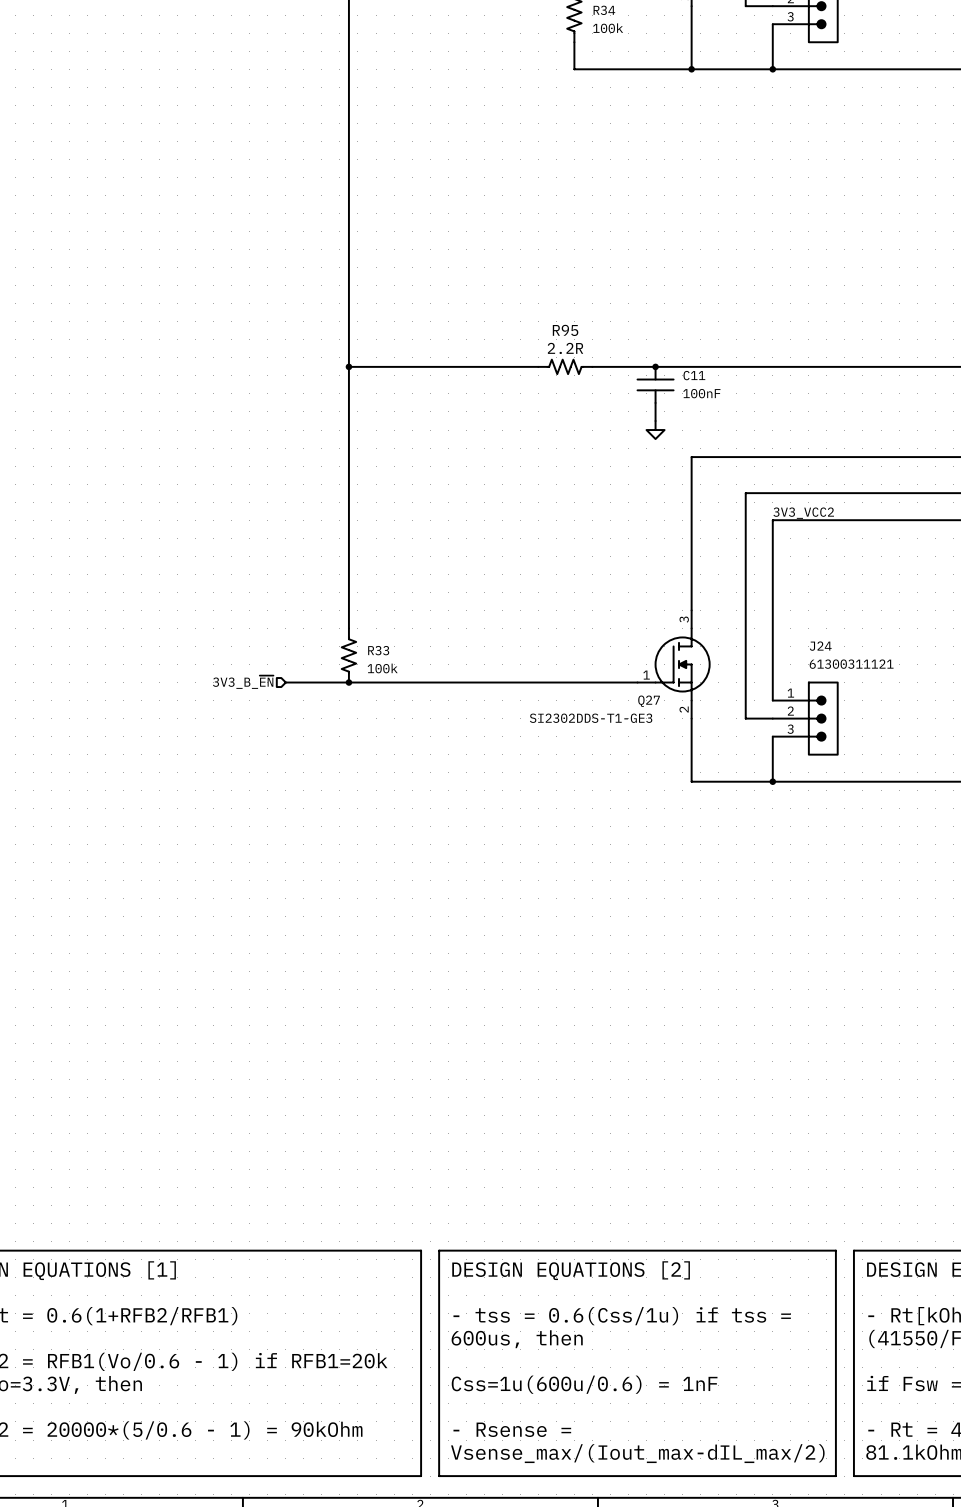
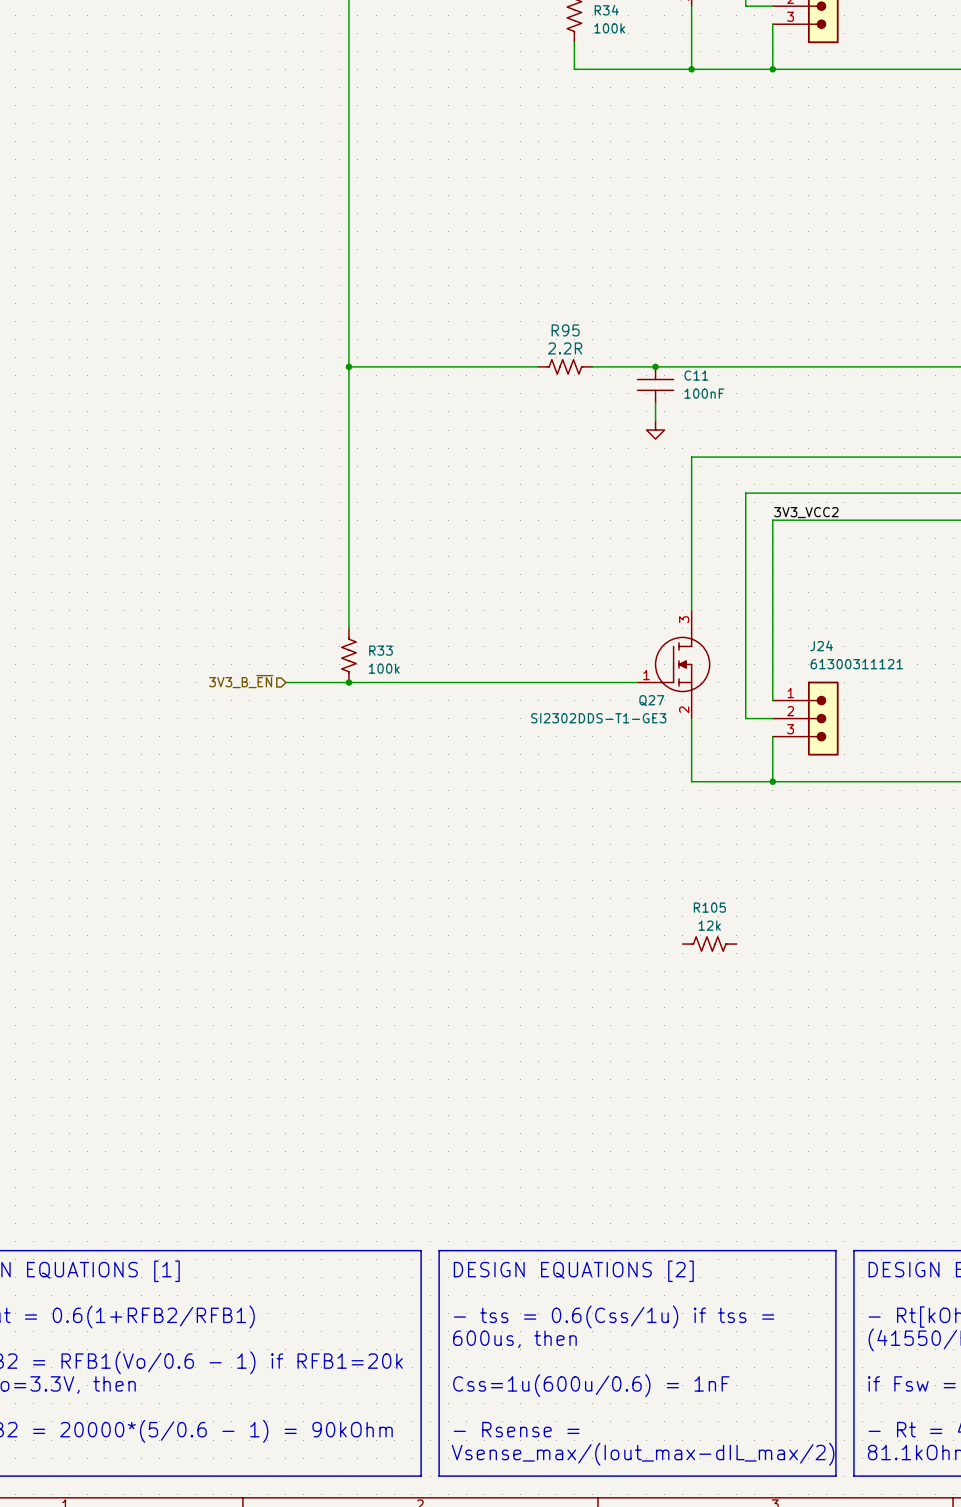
R105: none -> 12k (709, 944)

